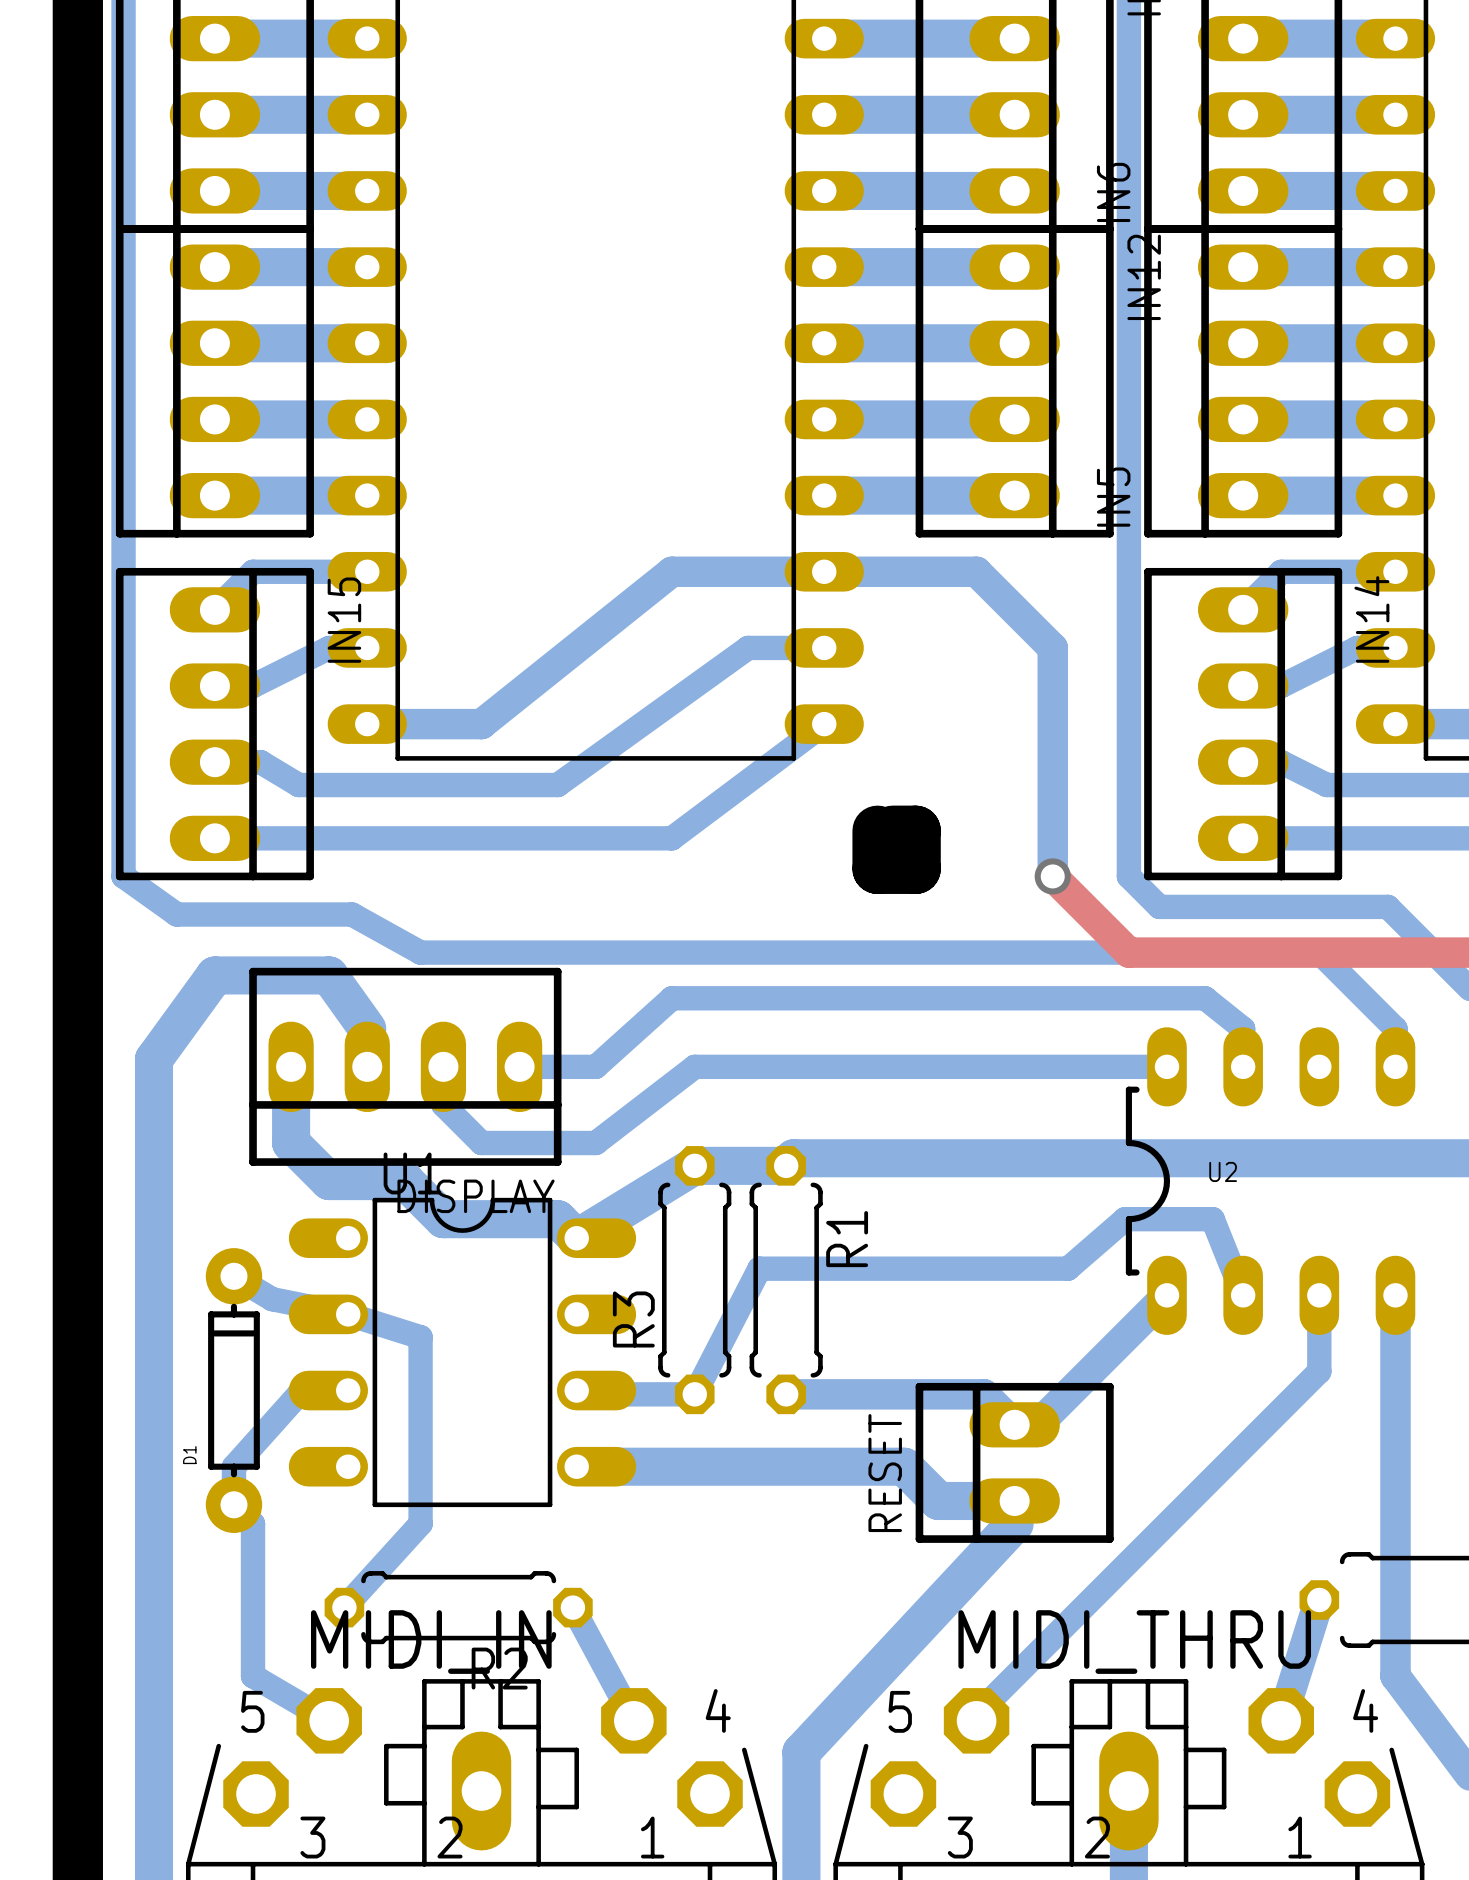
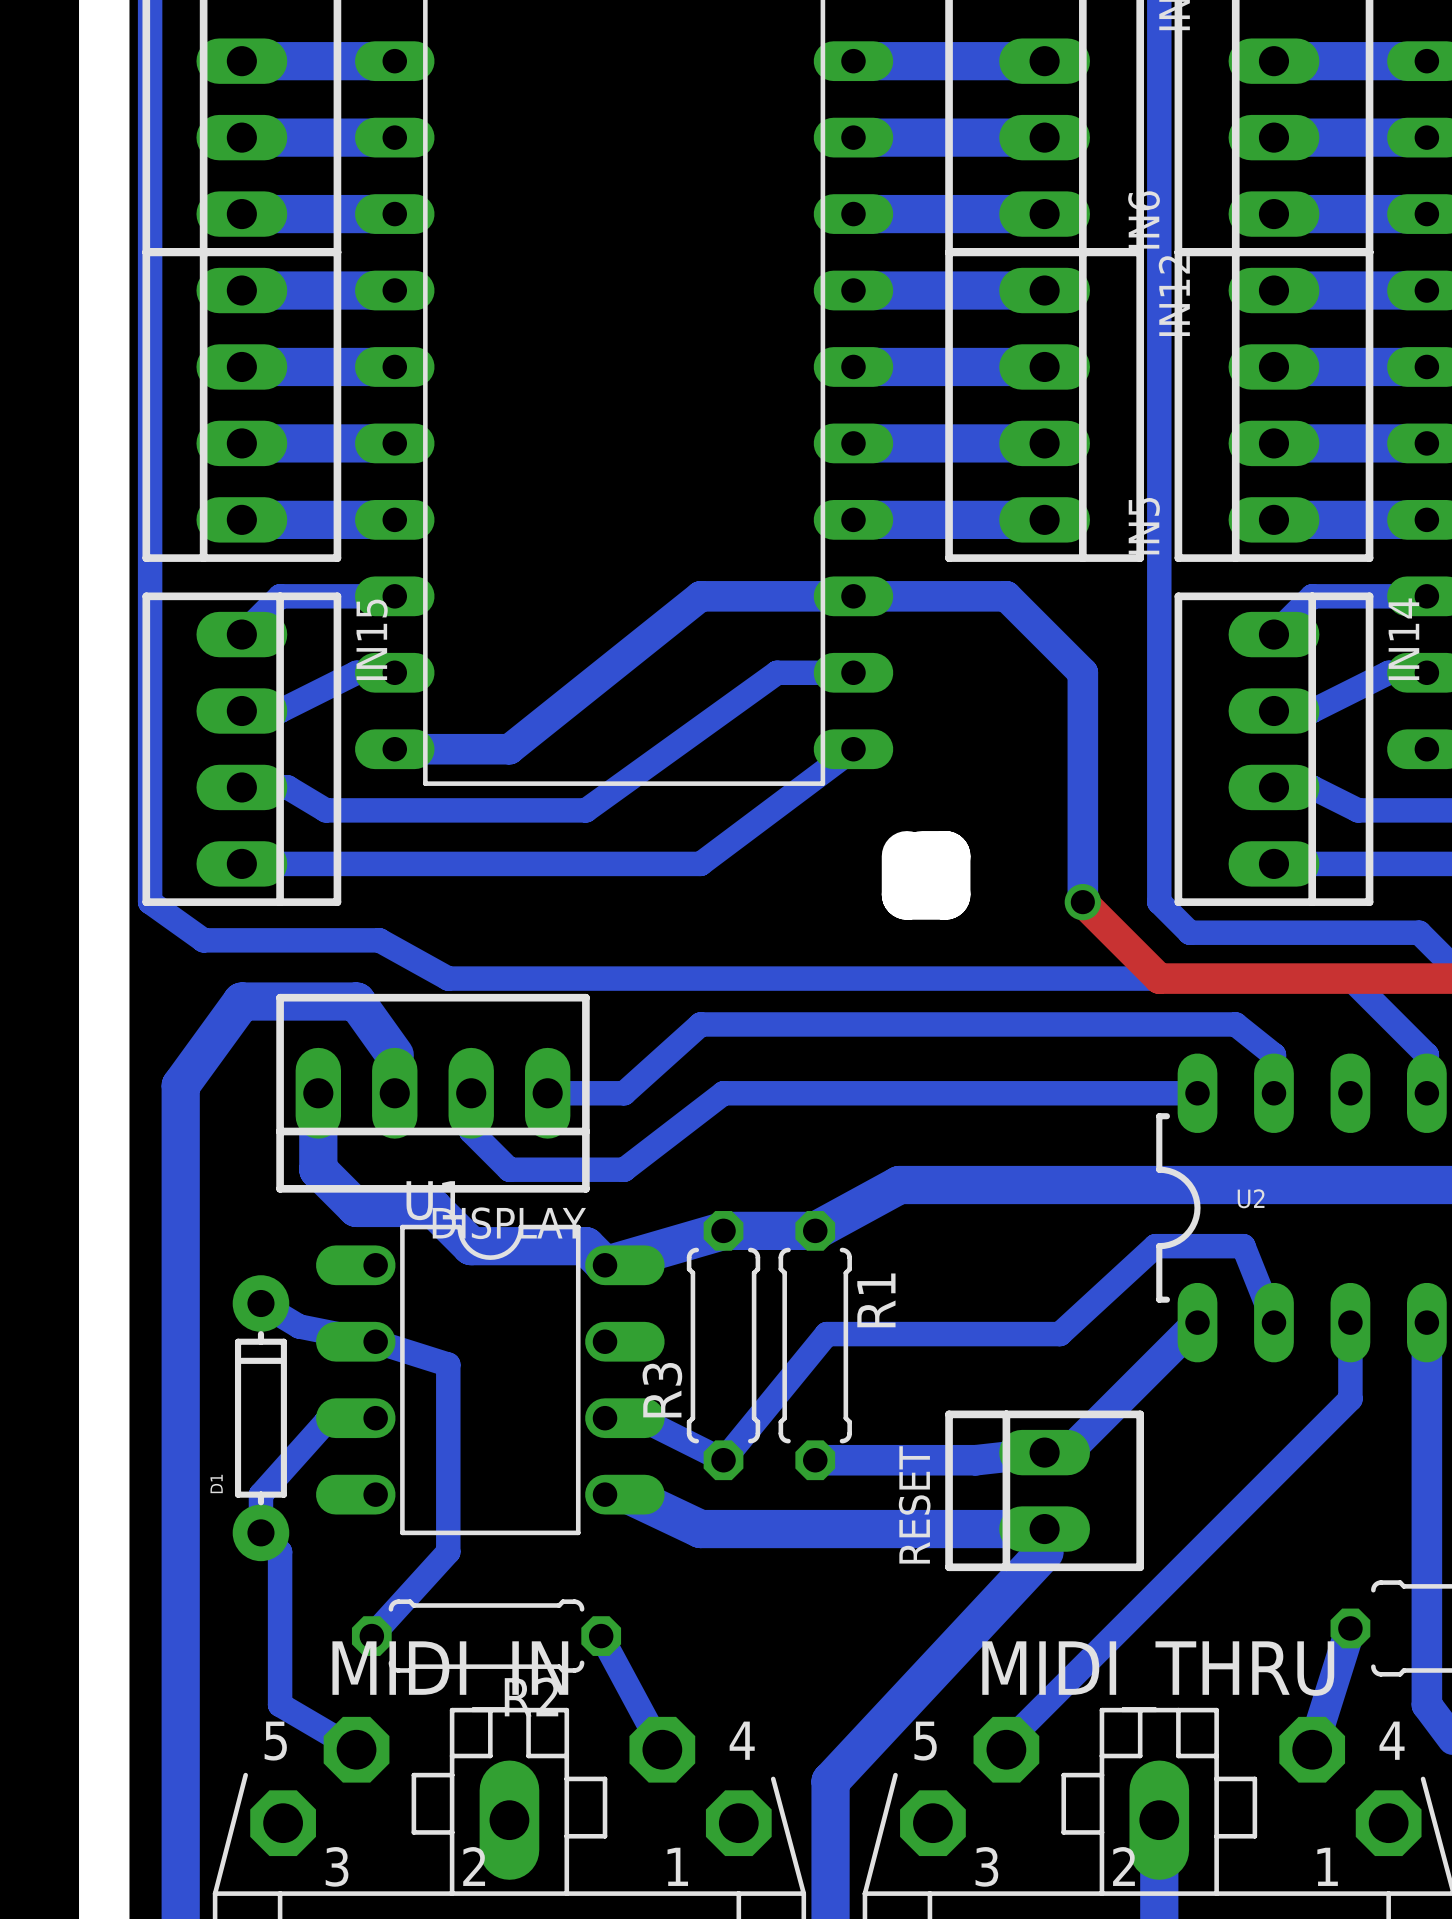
bottom track: (869, 1158) (793, 1158) (786, 1165) (694, 1165) (576, 1238) -> (899, 1185) (815, 1230) (723, 1230) (605, 1265)
bottom track: (1125, 1219) (1067, 1268) (759, 1268) (694, 1394) (618, 1394) -> (1155, 1246) (1059, 1334) (826, 1334) (723, 1460) (647, 1422)
R3 position: (694, 1280) -> (723, 1345)
R1 position: (786, 1280) -> (815, 1345)
bottom track: (786, 1394) (984, 1394) (1014, 1424) -> (815, 1460) (975, 1460) (1044, 1452)
bottom track: (599, 1466) (904, 1466) (938, 1500) -> (627, 1494) (700, 1529) (968, 1529)

